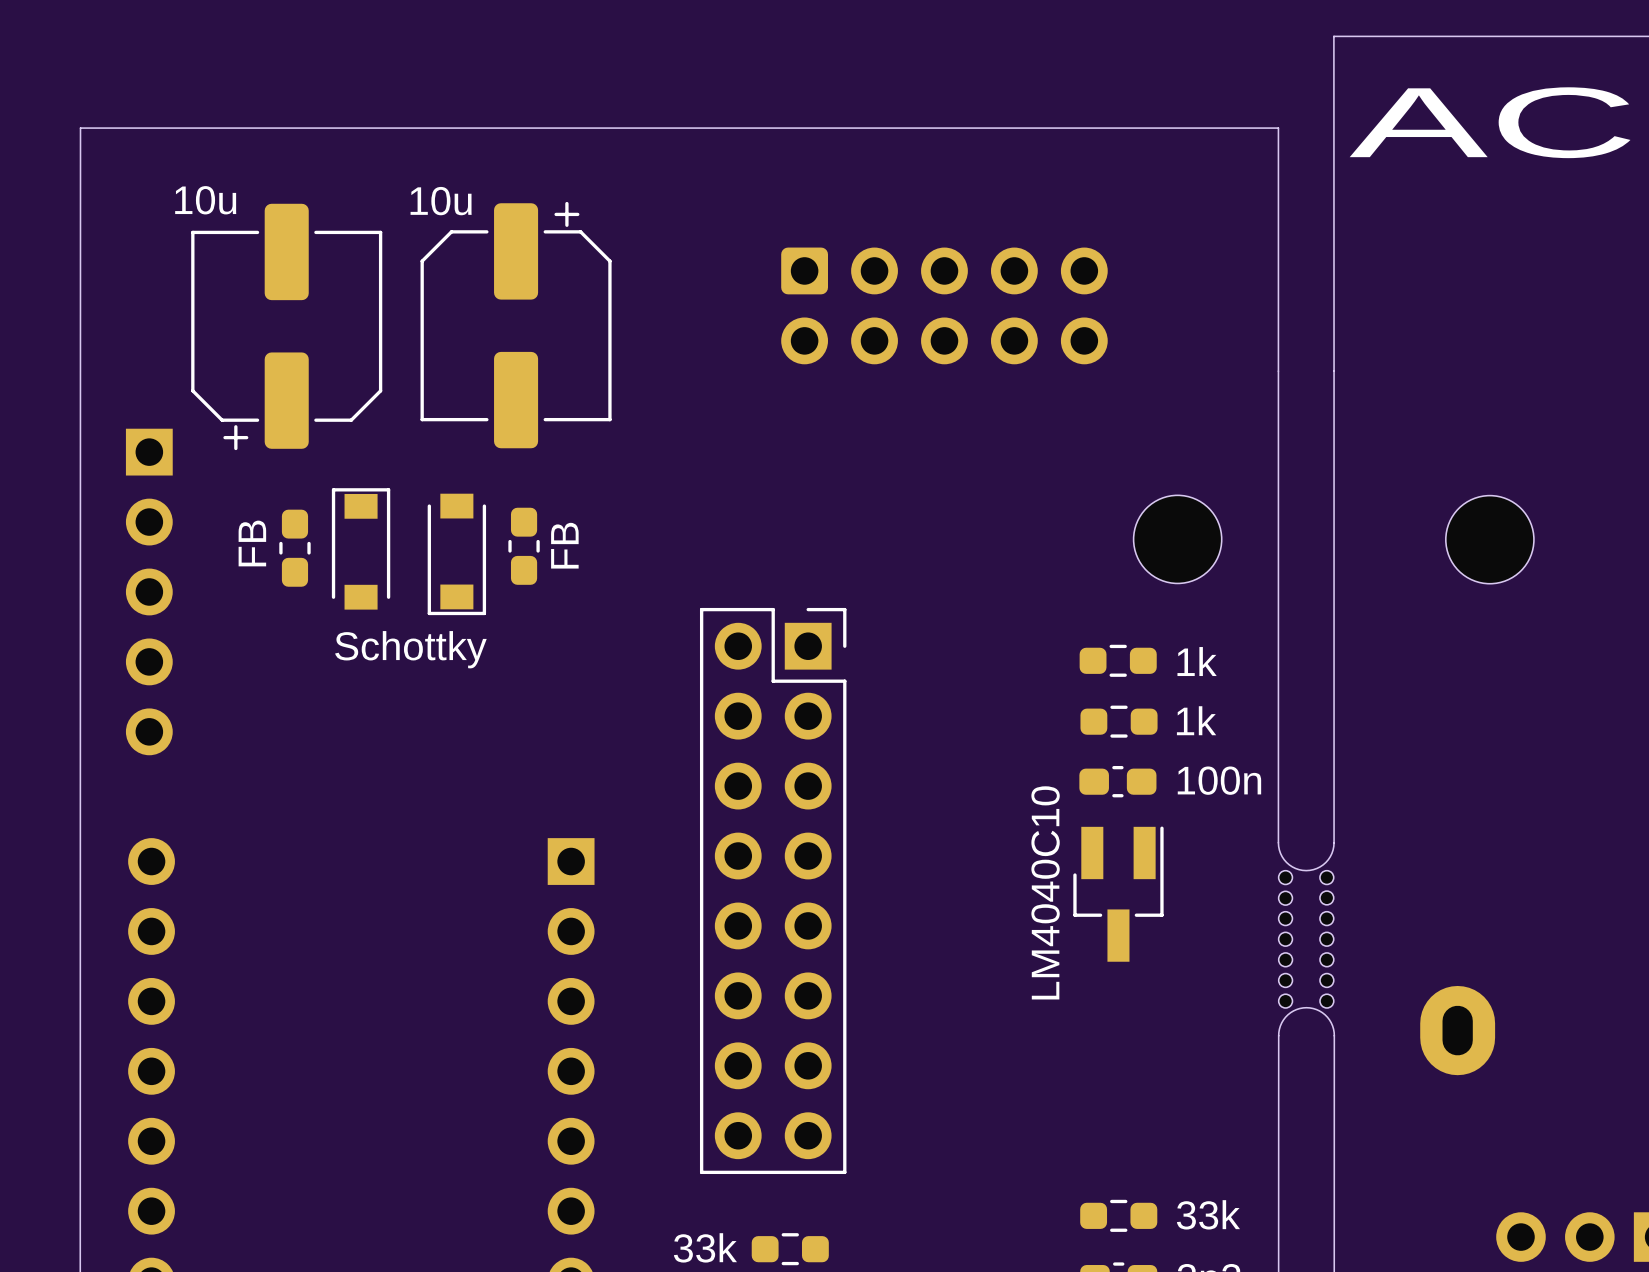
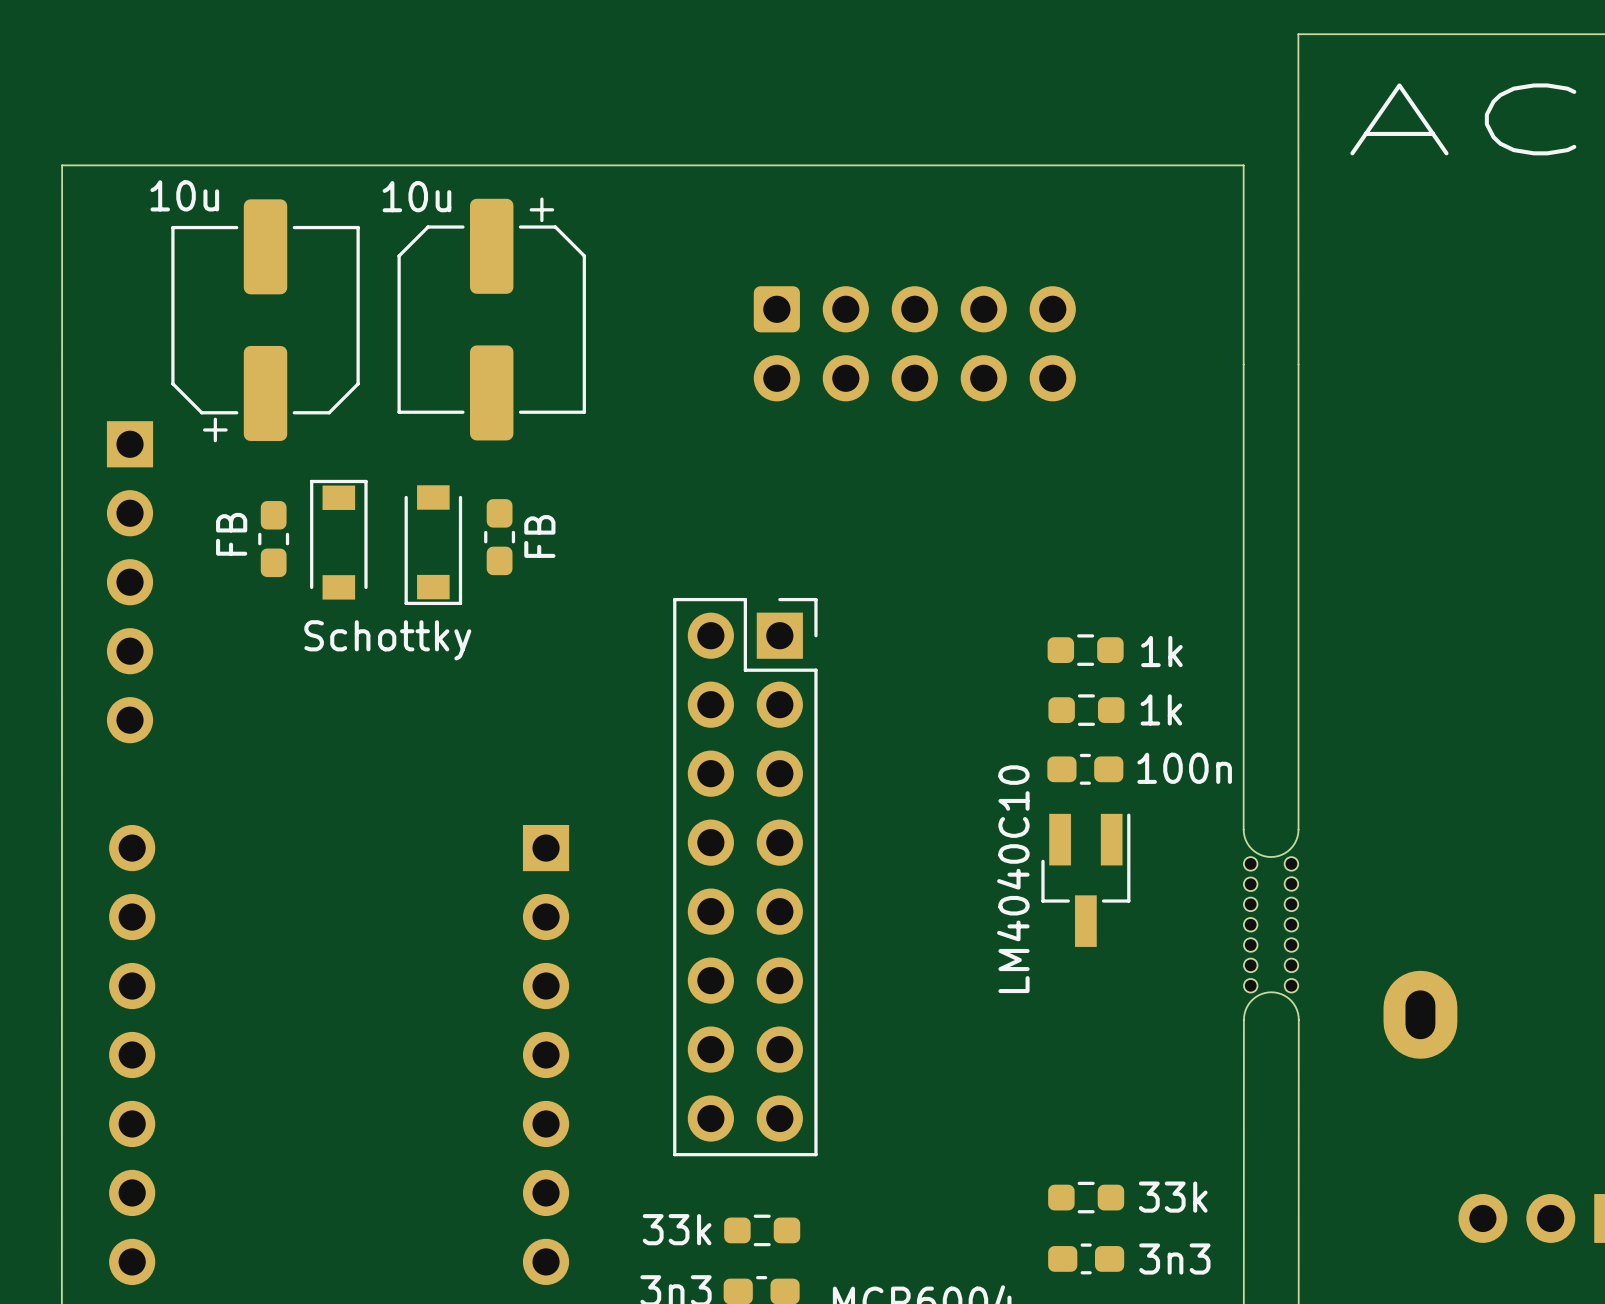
board edge: (80, 169) (80, 128) (1278, 128) (1278, 169) -> (62, 165) (1243, 165)
part position: (944, 305) -> (914, 343)
part: (1177, 539) -> none
part: (1489, 539) -> none

